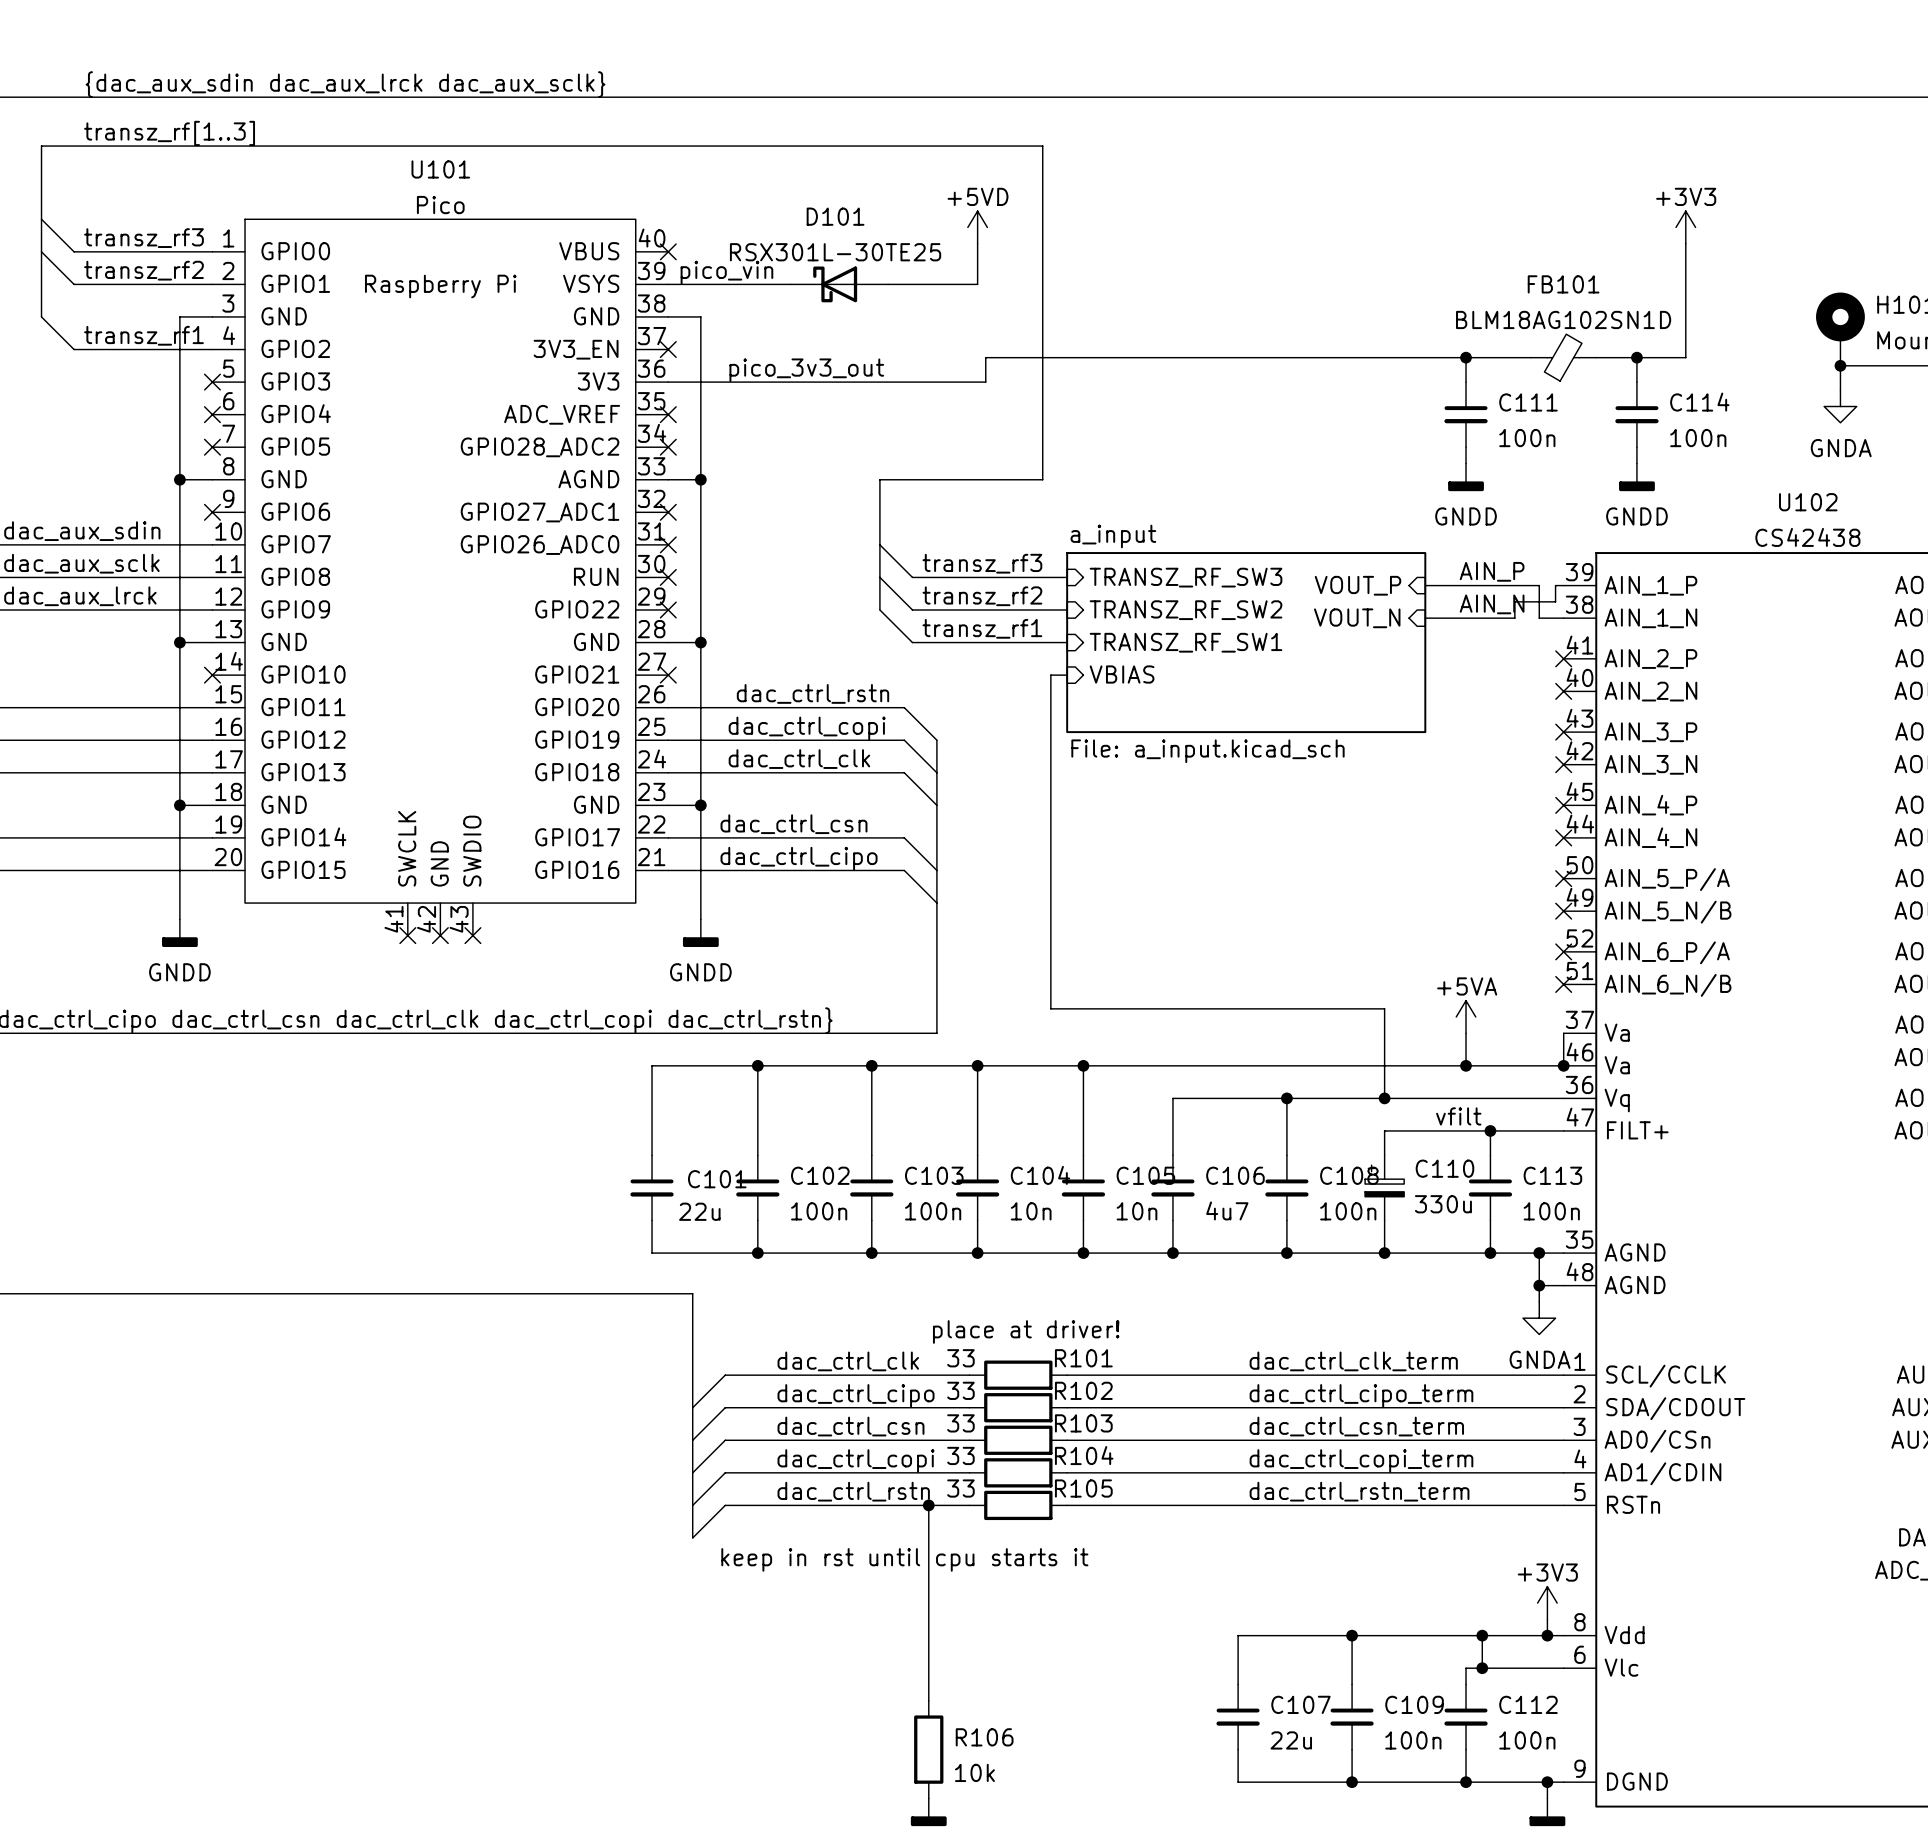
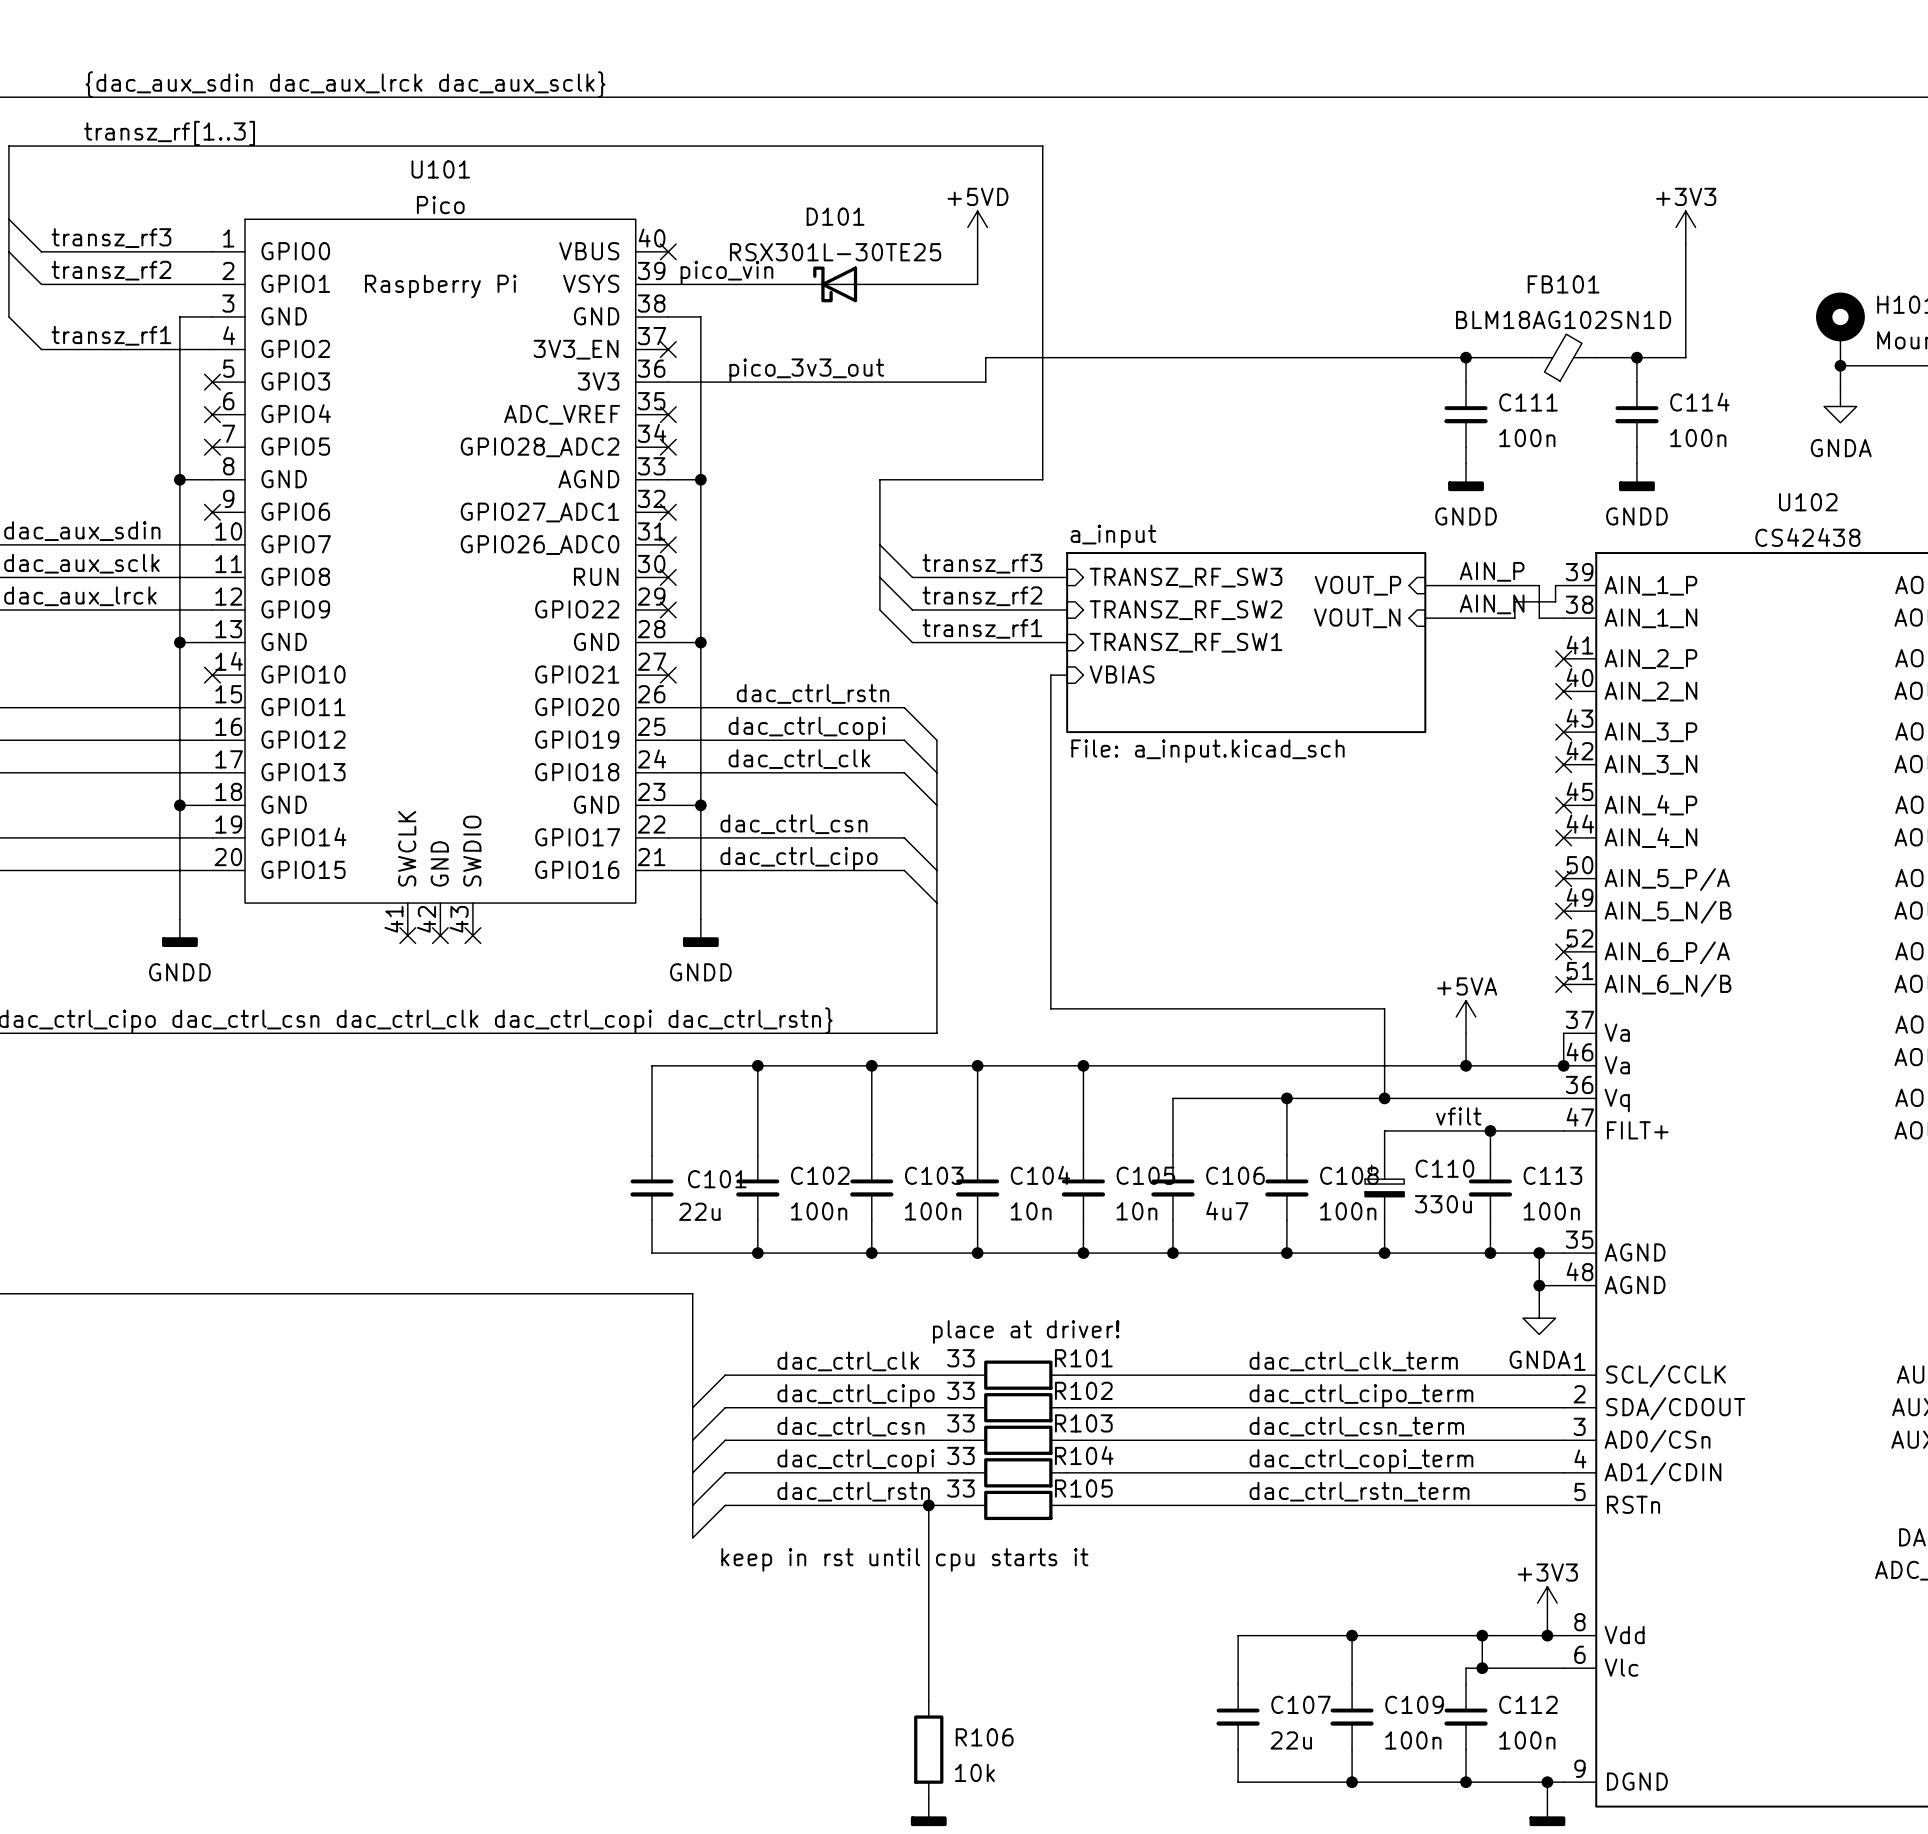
bus: (41, 146) (41, 316) -> (41, 146) (8, 146) (8, 316)
wire: (41, 219) (74, 251) -> (8, 219) (41, 251) (74, 251)
label position: transz_rf3 (143, 238) -> transz_rf3 (111, 238)
wire: (41, 251) (74, 284) -> (8, 251) (41, 284) (74, 284)
label position: transz_rf2 (143, 270) -> transz_rf2 (111, 270)
wire: (41, 316) (74, 349) -> (8, 316) (41, 349) (74, 349)
label position: transz_rf1 (143, 335) -> transz_rf1 (111, 335)

